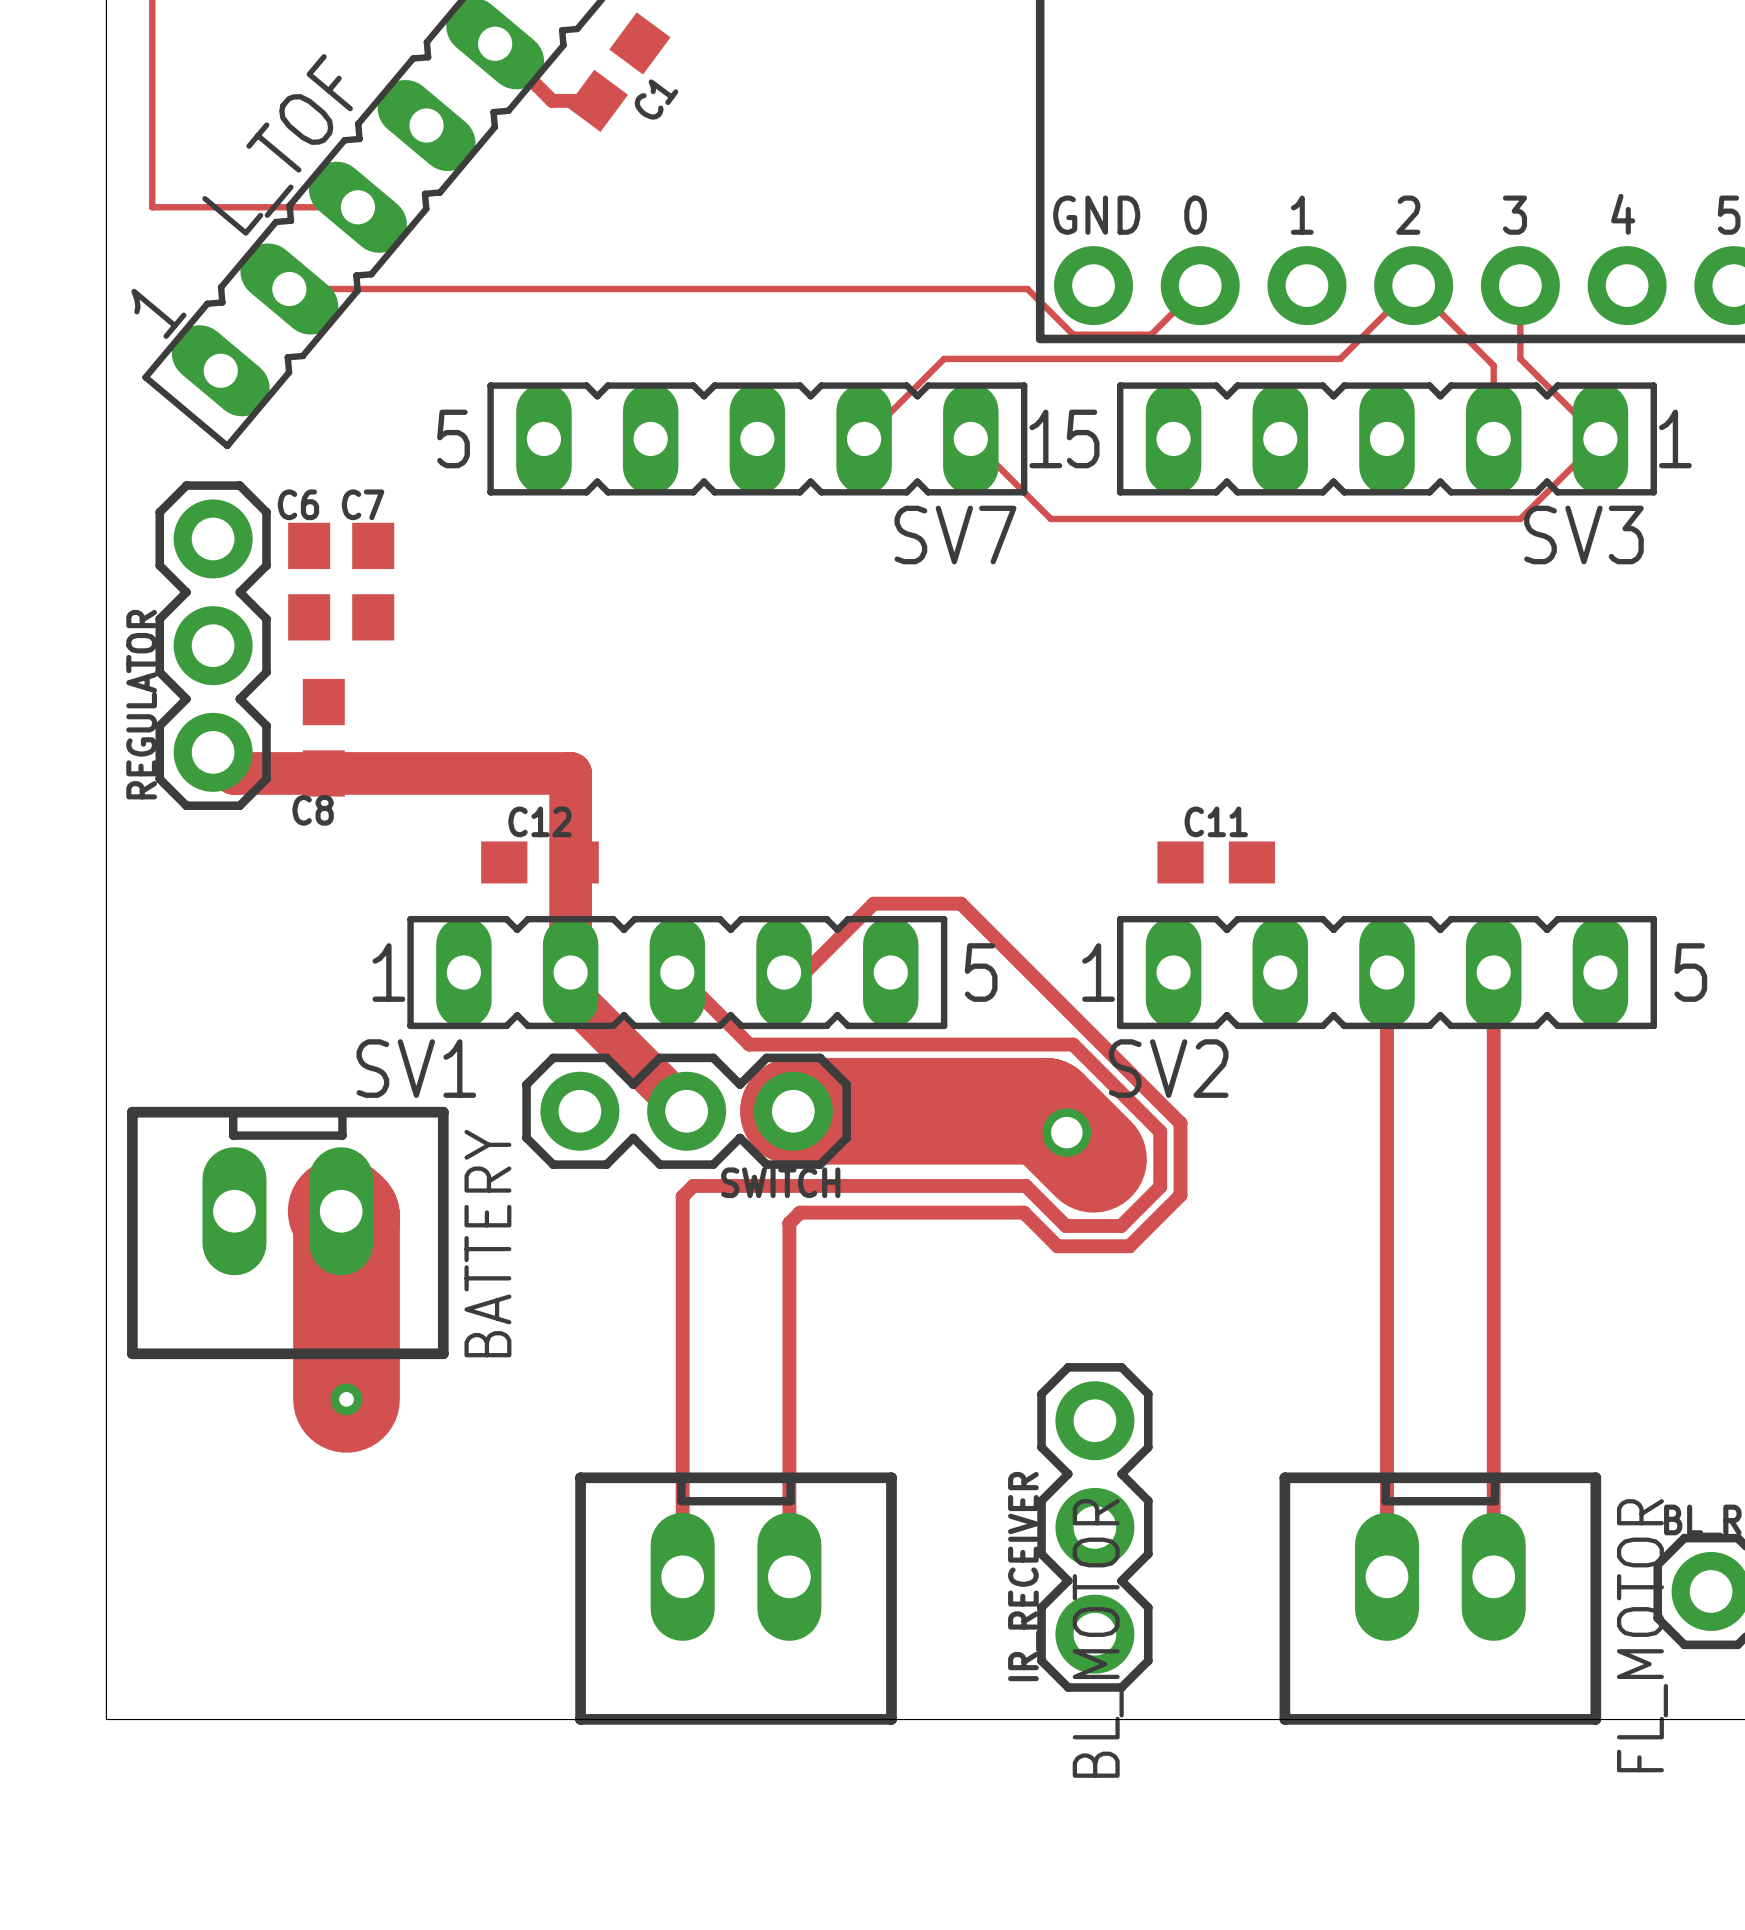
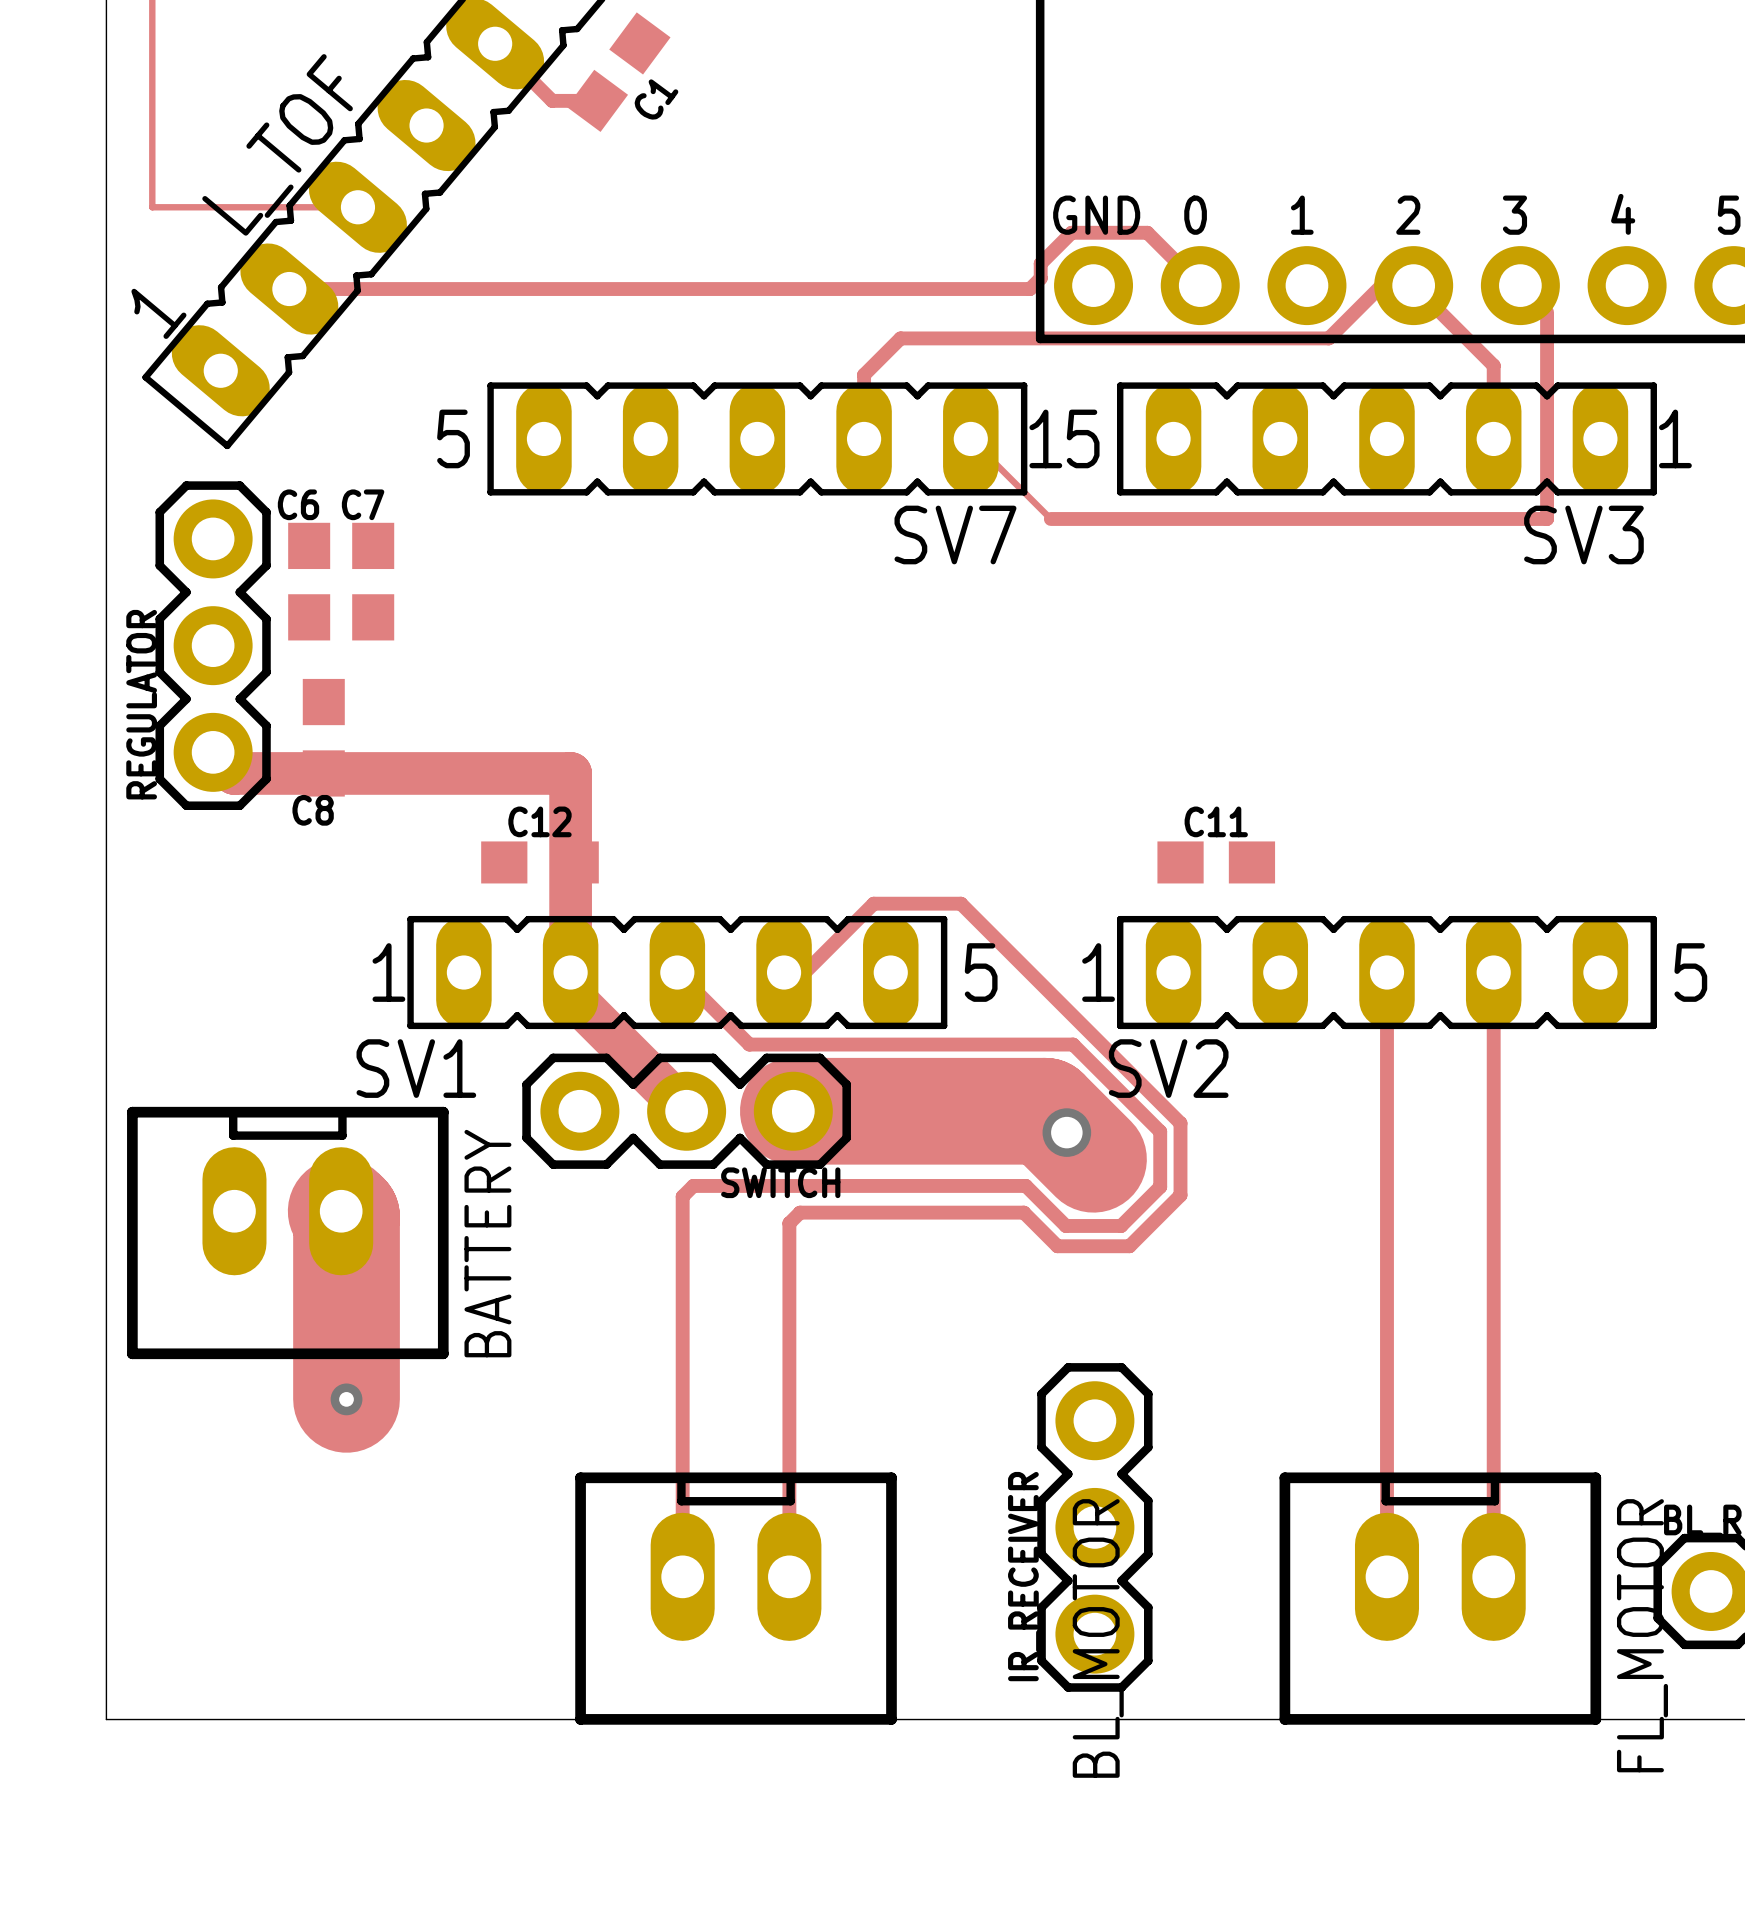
track: (1200, 285) (1151, 334) (1073, 334) (1027, 289) -> (1200, 285) (1147, 232) (1071, 232) (1040, 263) (1040, 278) (1030, 289) (1027, 289)
track: (1413, 285) (1340, 358) (944, 358) (864, 438) -> (1413, 285) (1381, 285) (1328, 338) (900, 338) (864, 374) (864, 438)
track width: thin (1413, 285) (1493, 365) (1493, 438) -> thick (1413, 285) (1493, 365) (1493, 438)
track: (1520, 285) (1520, 358) (1600, 438) (1520, 518) -> (1547, 312) (1547, 518) (1520, 518)
track width: thin (289, 289) (1027, 289) -> thick (289, 289) (1027, 289)
track width: thin (1050, 518) (1520, 518) -> thick (1050, 518) (1520, 518)

